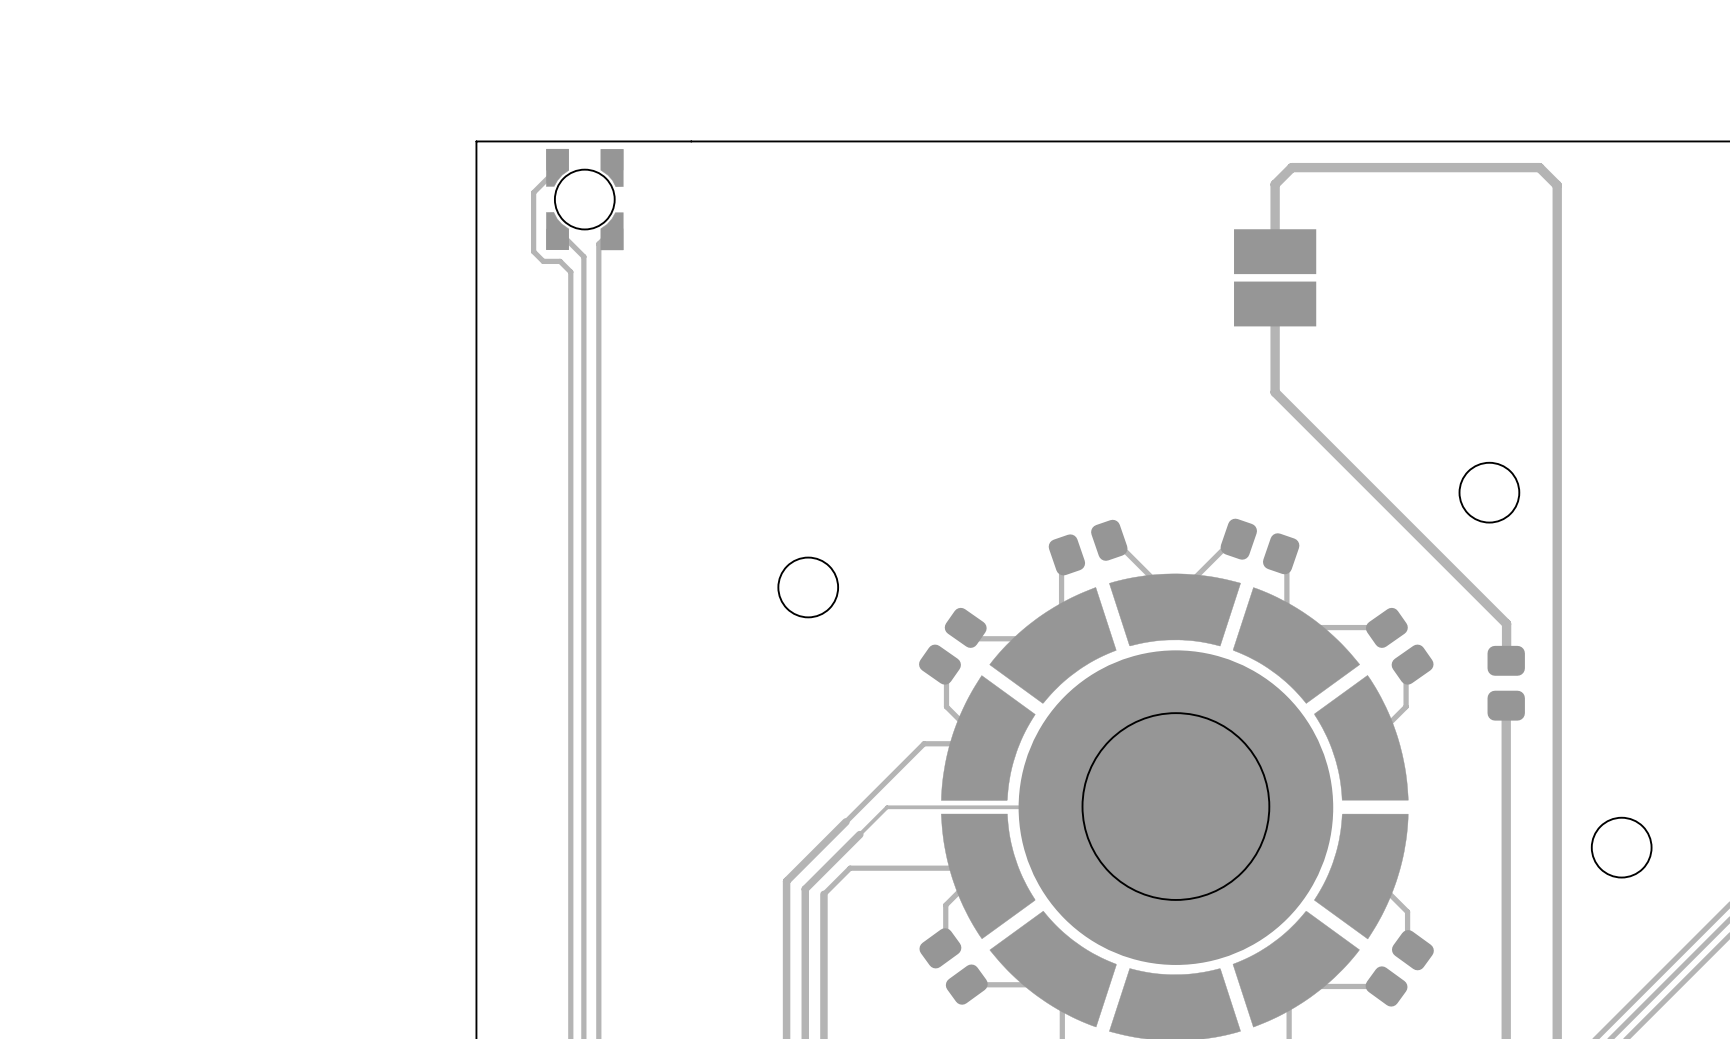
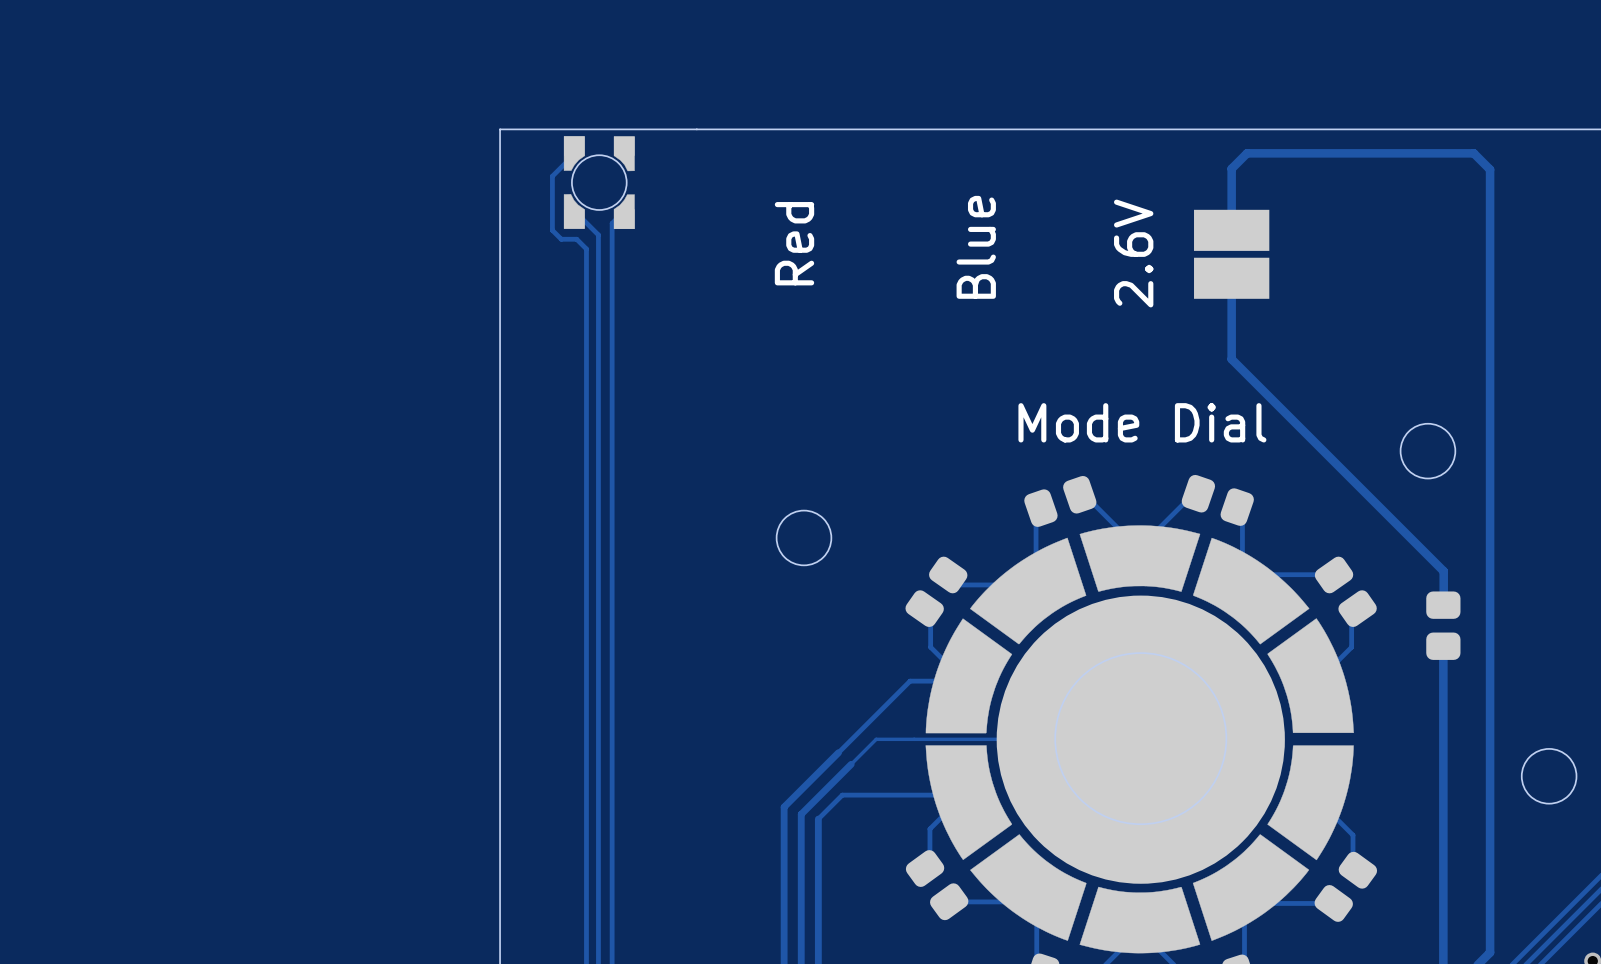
part: none -> Red (794, 243)
part: none -> Blue (976, 247)
part value: none -> 2.6V (1133, 253)
part value: none -> Mode Dial (1142, 422)

